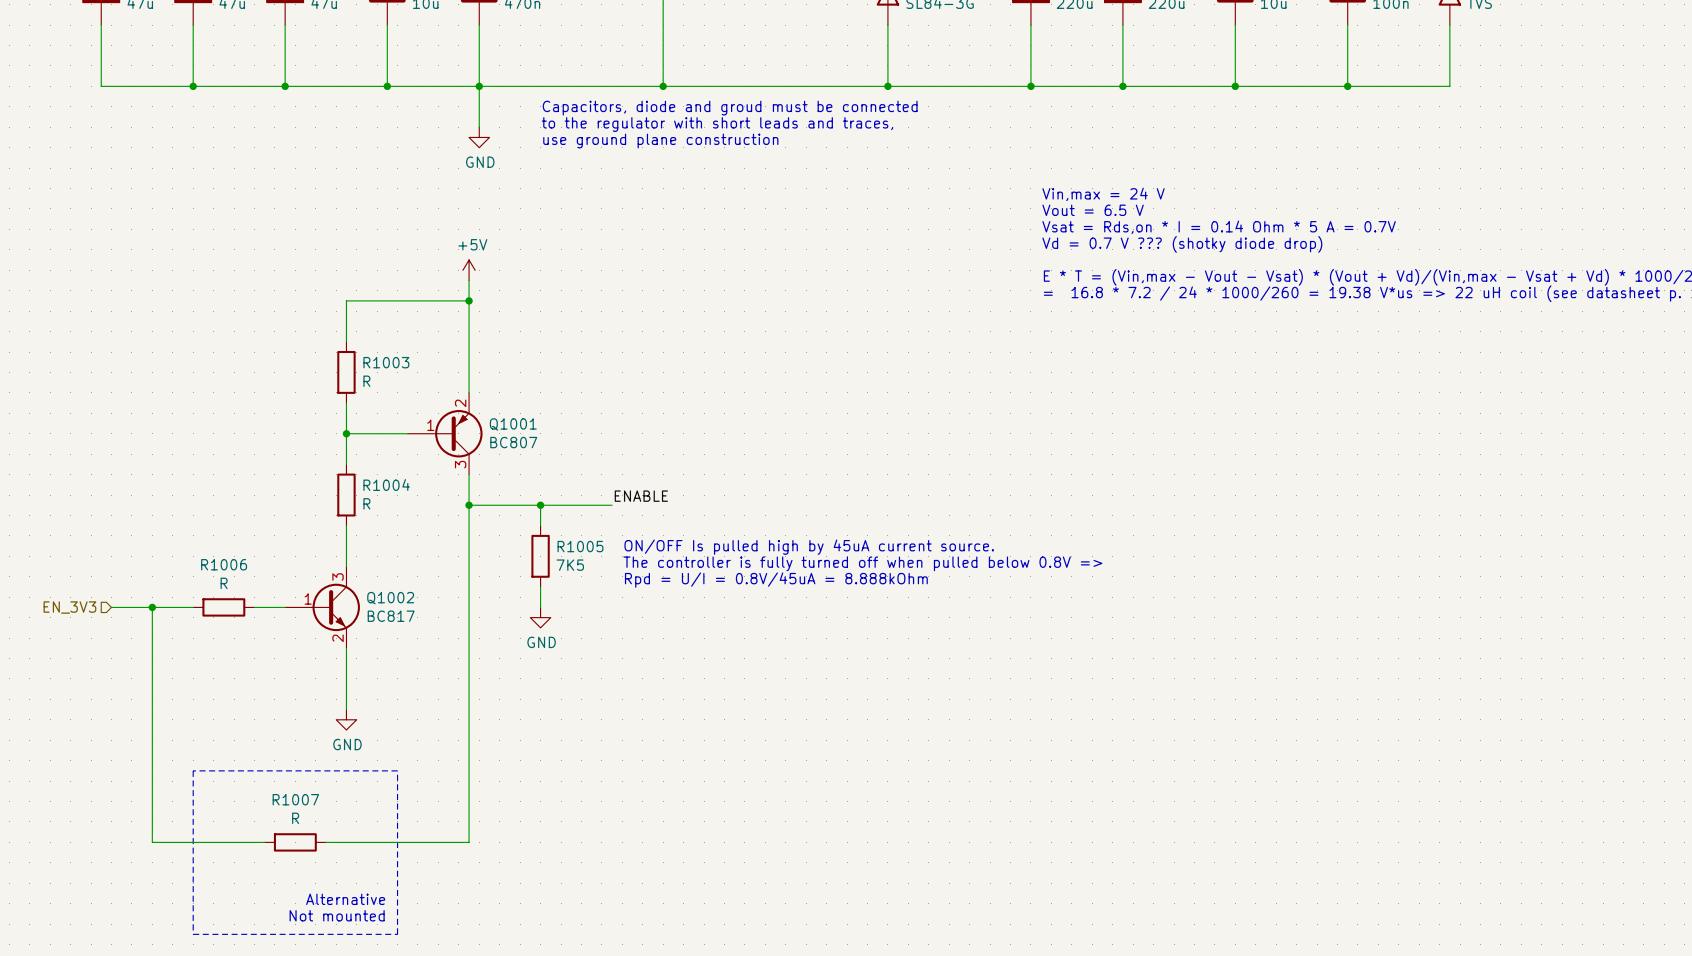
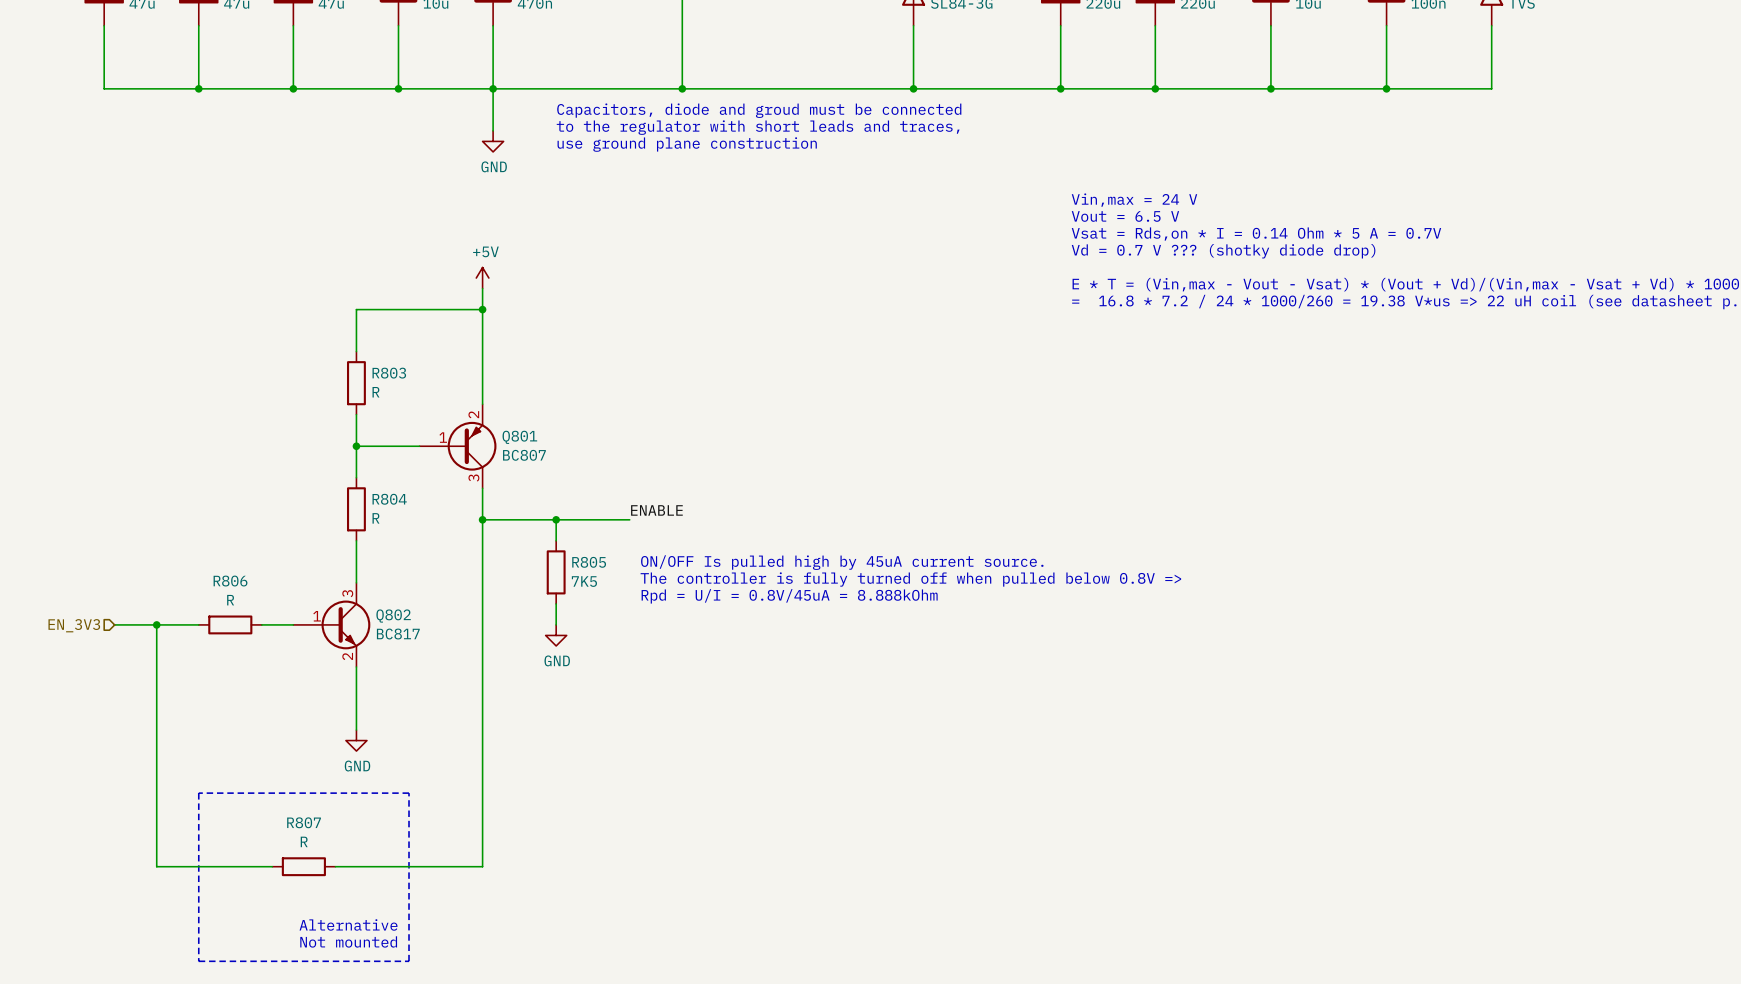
R1003 name: R1003 (386, 362) -> R803 (389, 373)
Q1001 name: Q1001 (513, 424) -> Q801 (519, 437)
R1004 name: R1004 (386, 485) -> R804 (389, 499)
R1005 name: R1005 (580, 546) -> R805 (589, 562)
R1006 name: R1006 (224, 564) -> R806 (230, 581)
Q1002 name: Q1002 (390, 598) -> Q802 (393, 616)
R1007 name: R1007 (295, 799) -> R807 (304, 822)

